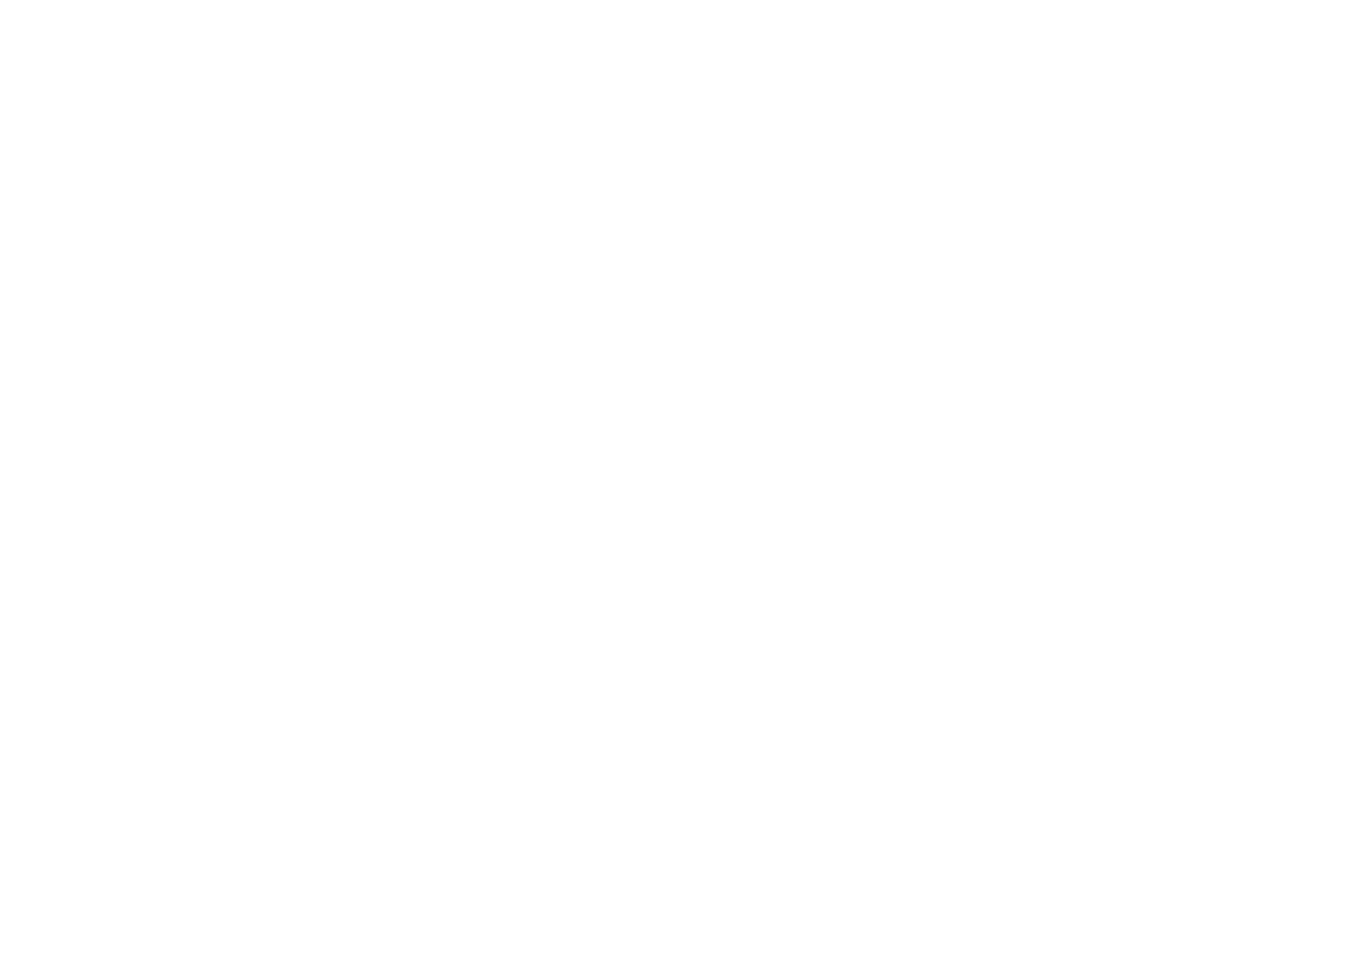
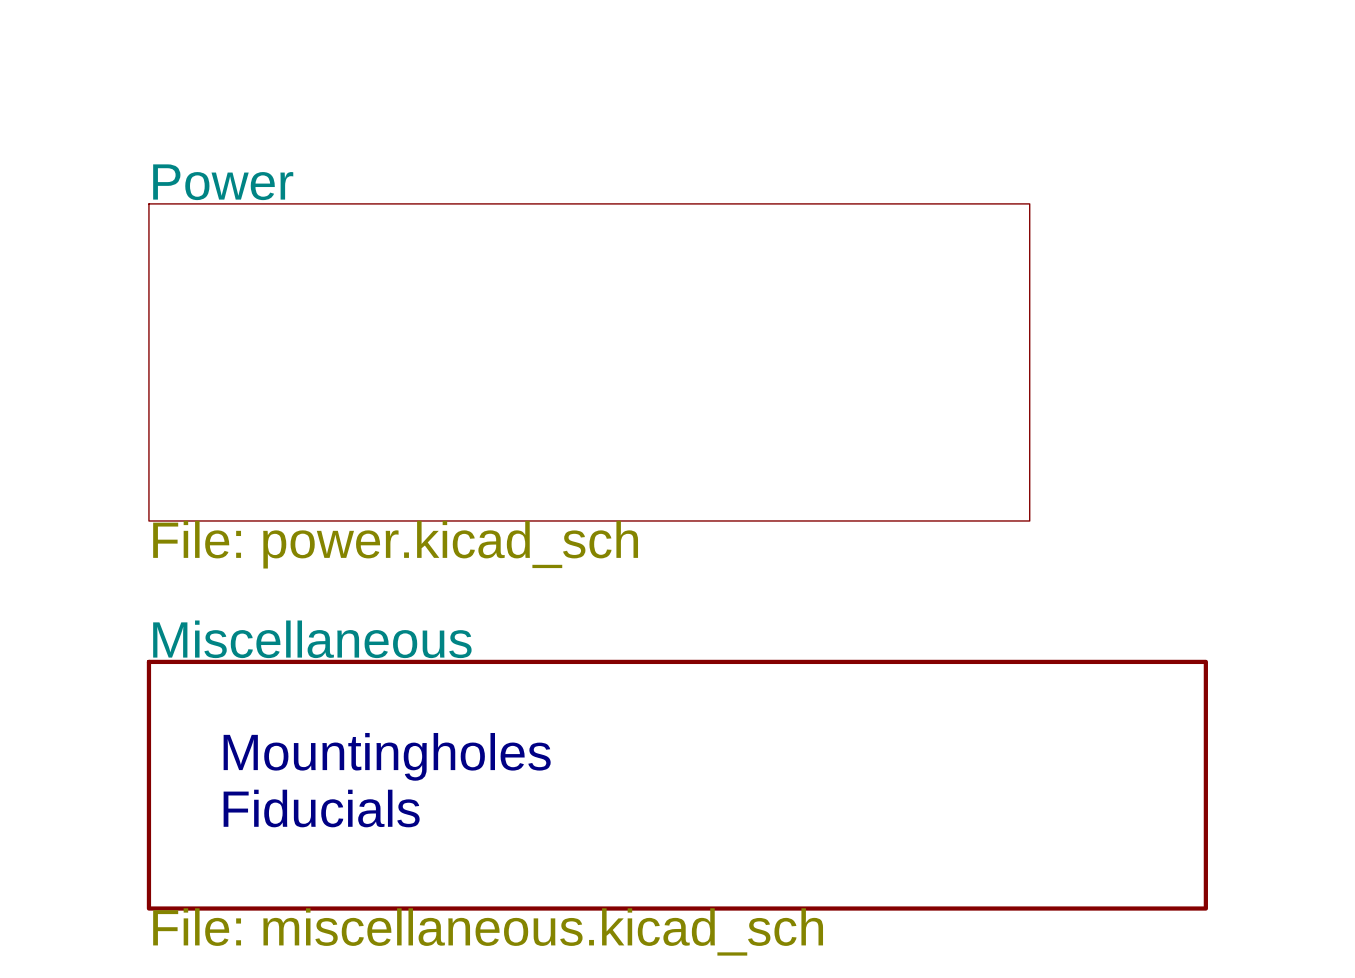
sheet Power: none -> File: power.kicad_sch (589, 362)
text: none -> Mountingholes (387, 756)
sheet Miscellaneous: none -> File: miscellaneous.kicad_sch (677, 785)
text: none -> Fiducials (321, 808)

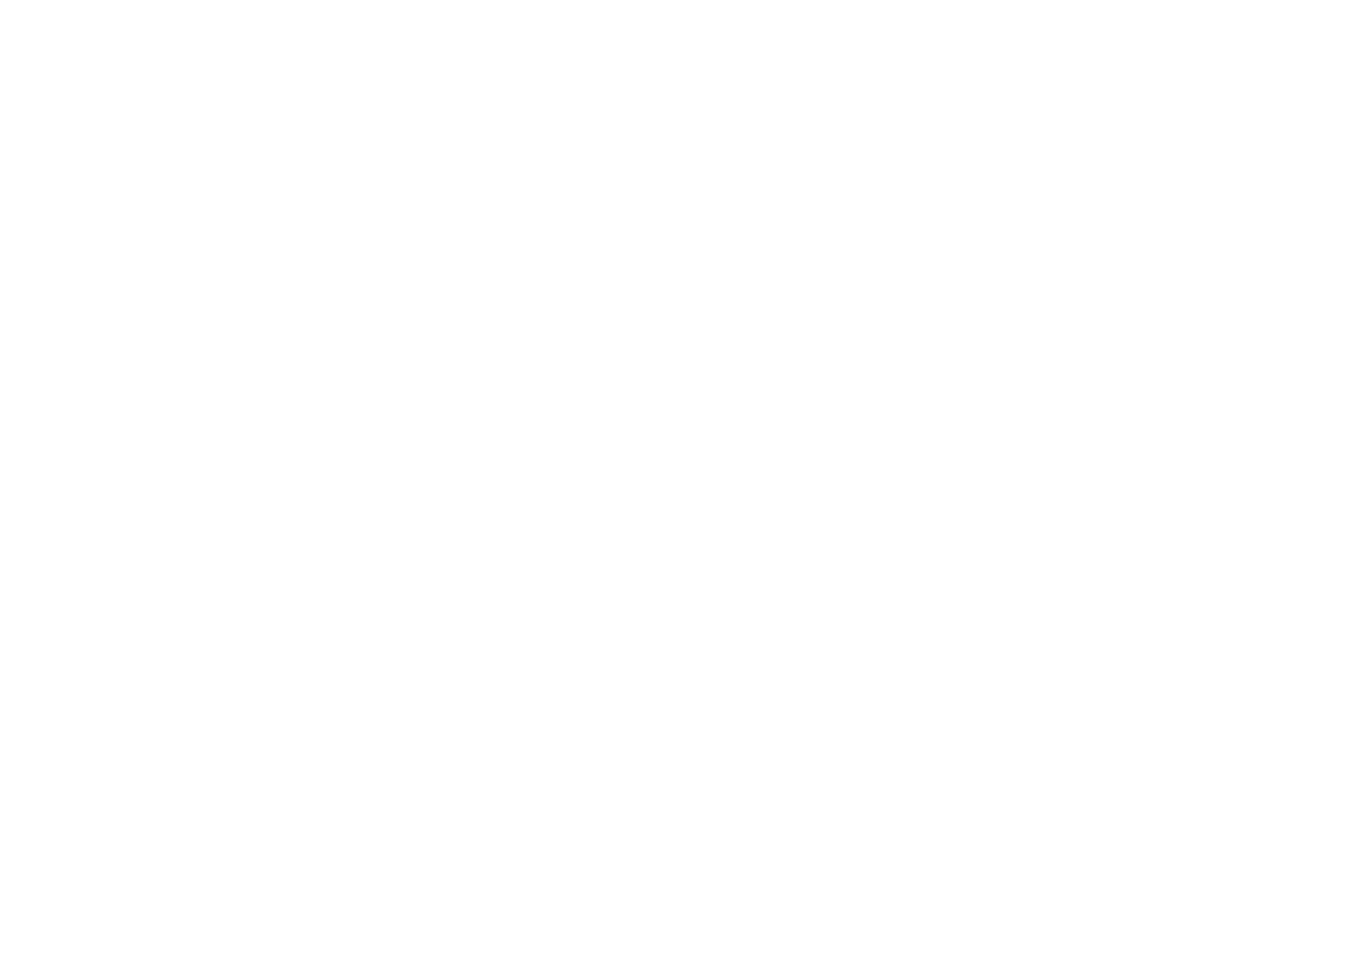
sheet Power: File: power.kicad_sch (589, 362) -> none
text: Mountingholes (387, 756) -> none
sheet Miscellaneous: File: miscellaneous.kicad_sch (677, 785) -> none
text: Fiducials (321, 808) -> none

